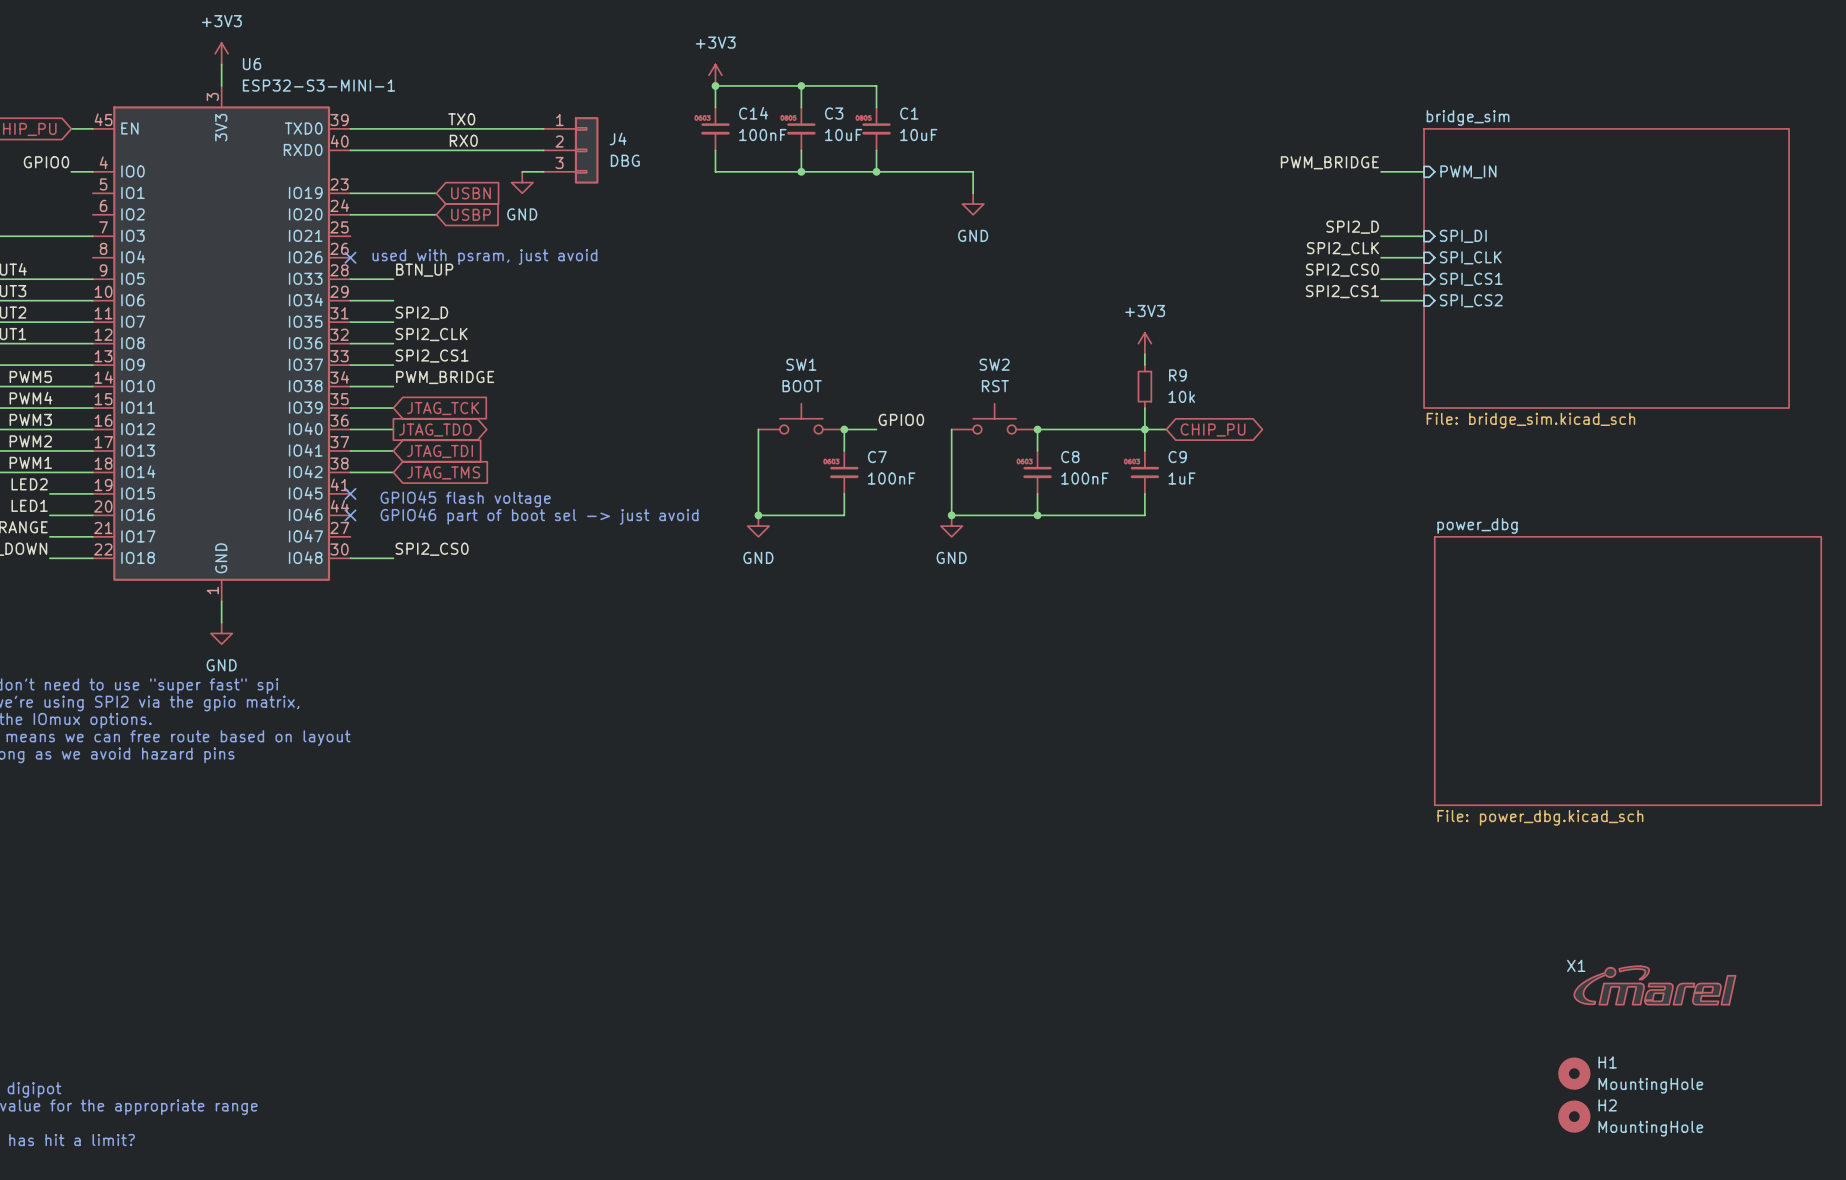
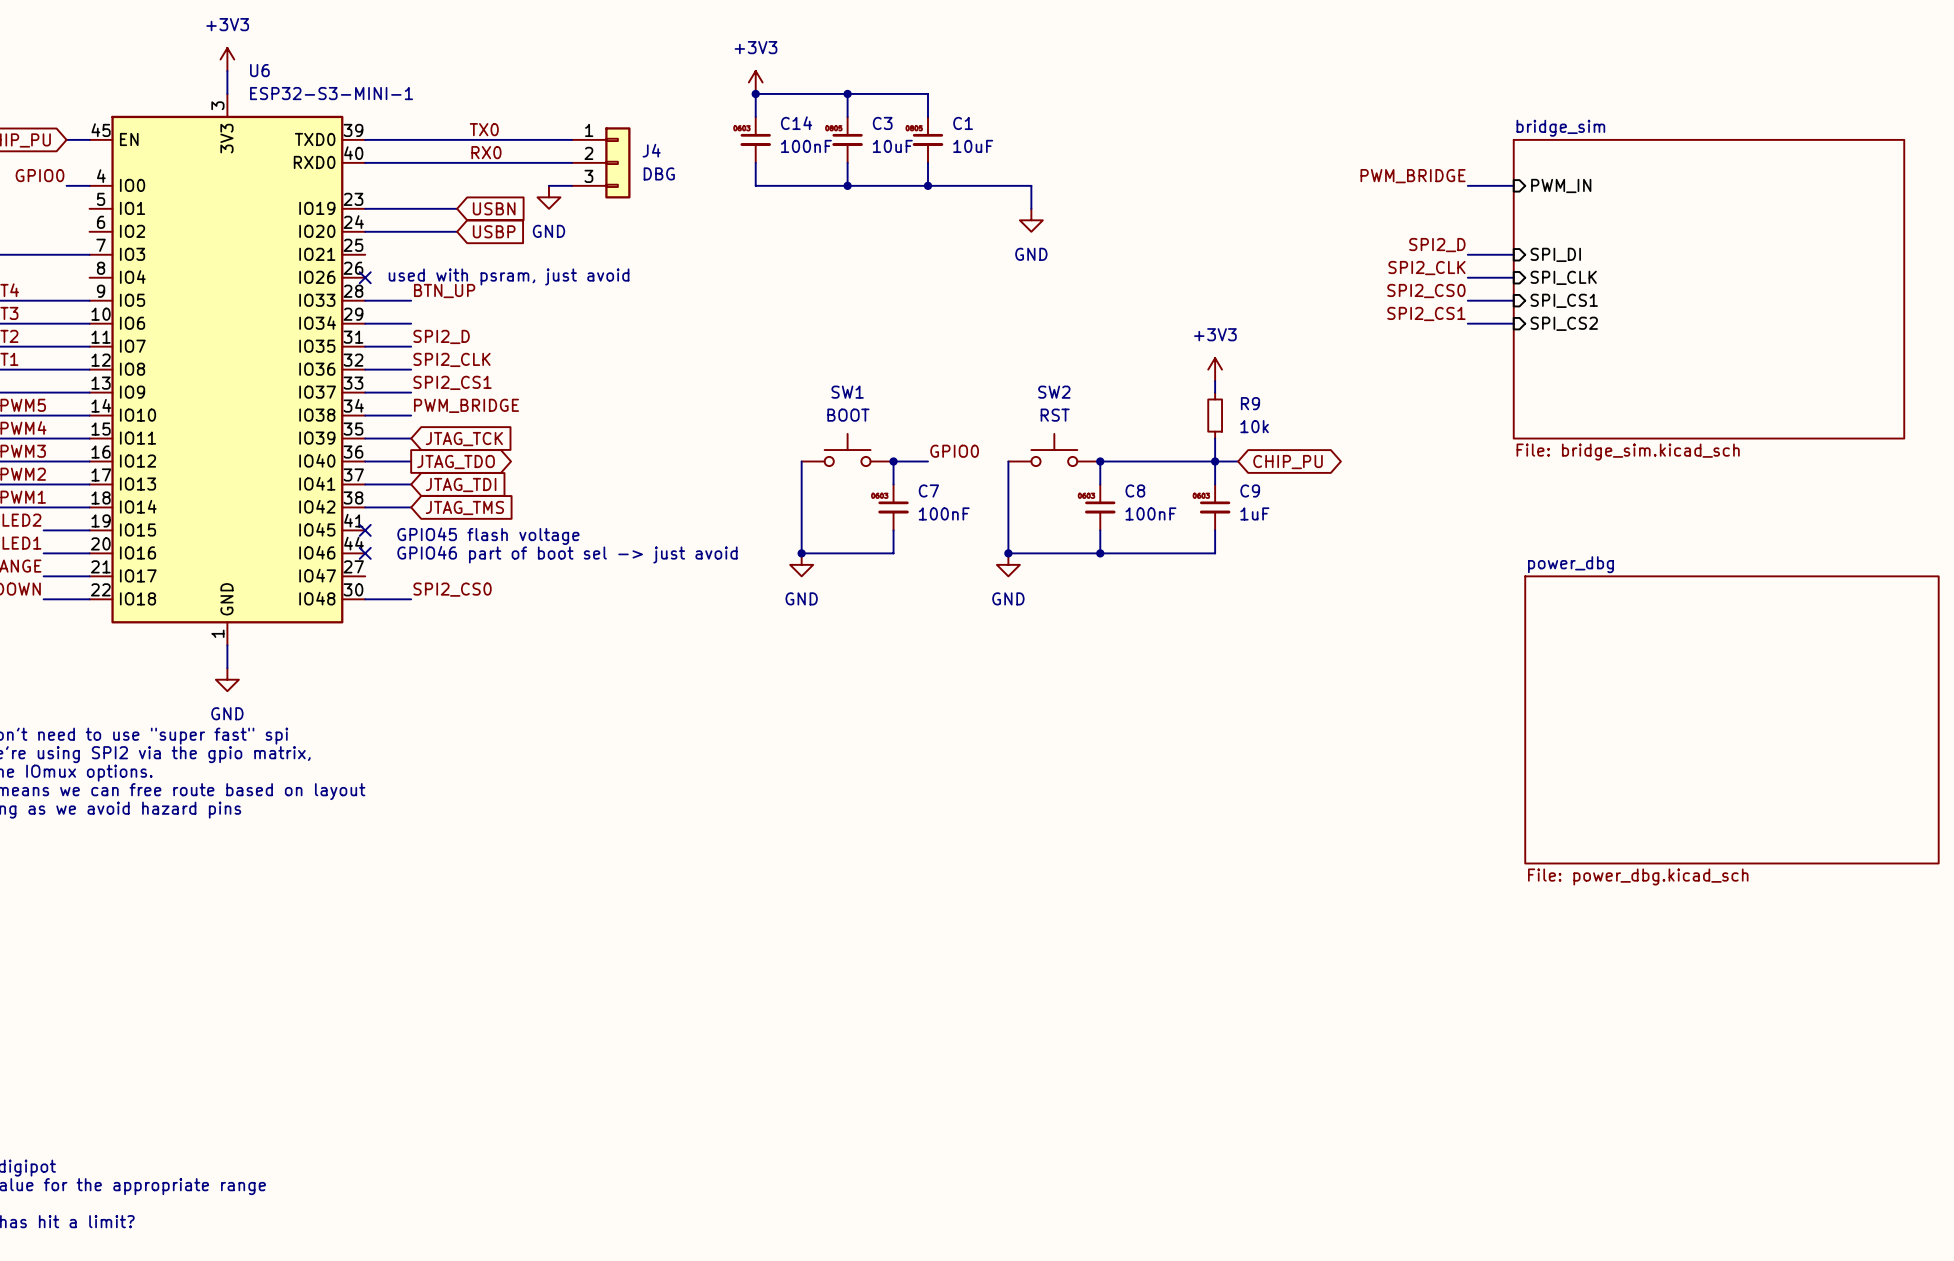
X1: (1654, 985) -> none
H1: MountingHole (1574, 1073) -> none
H2: MountingHole (1574, 1116) -> none

